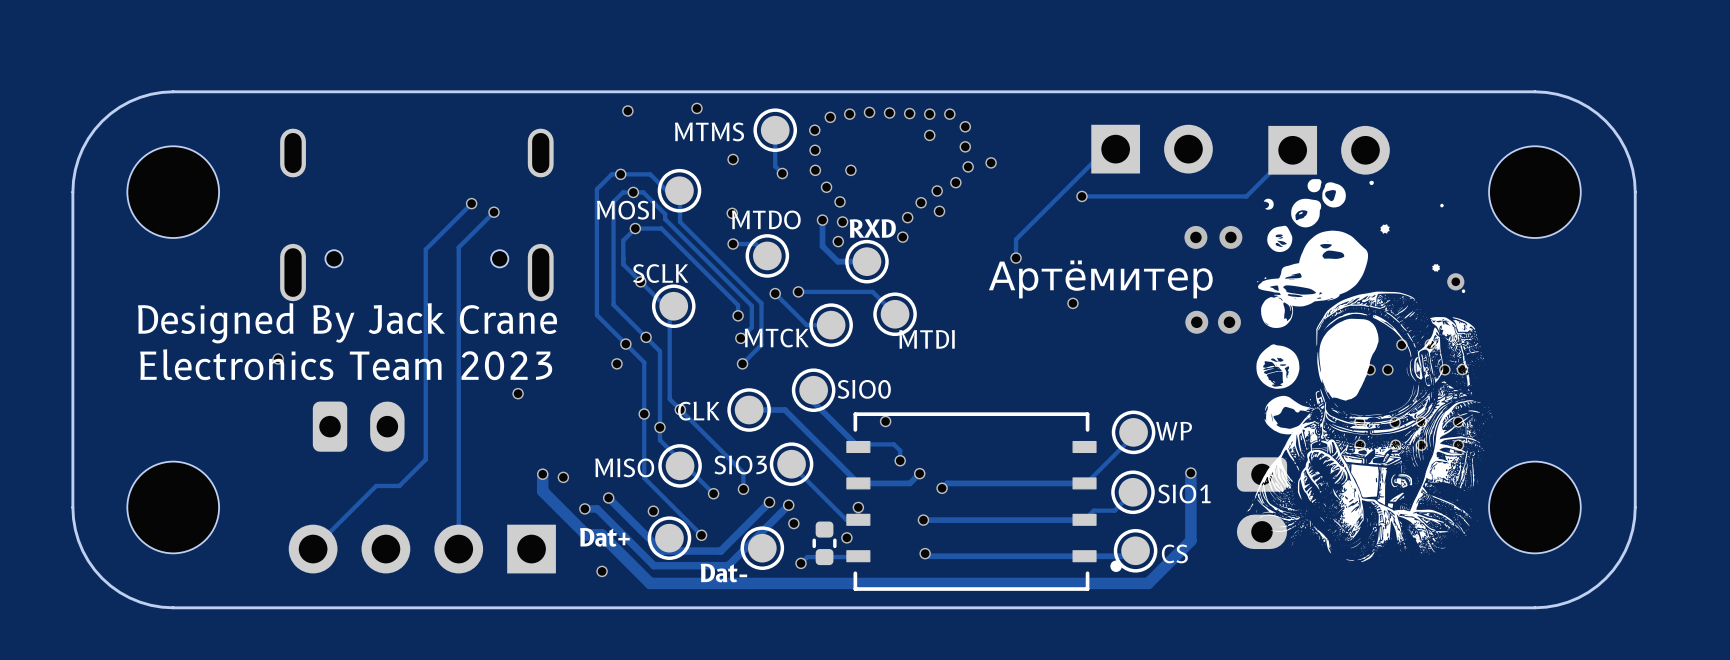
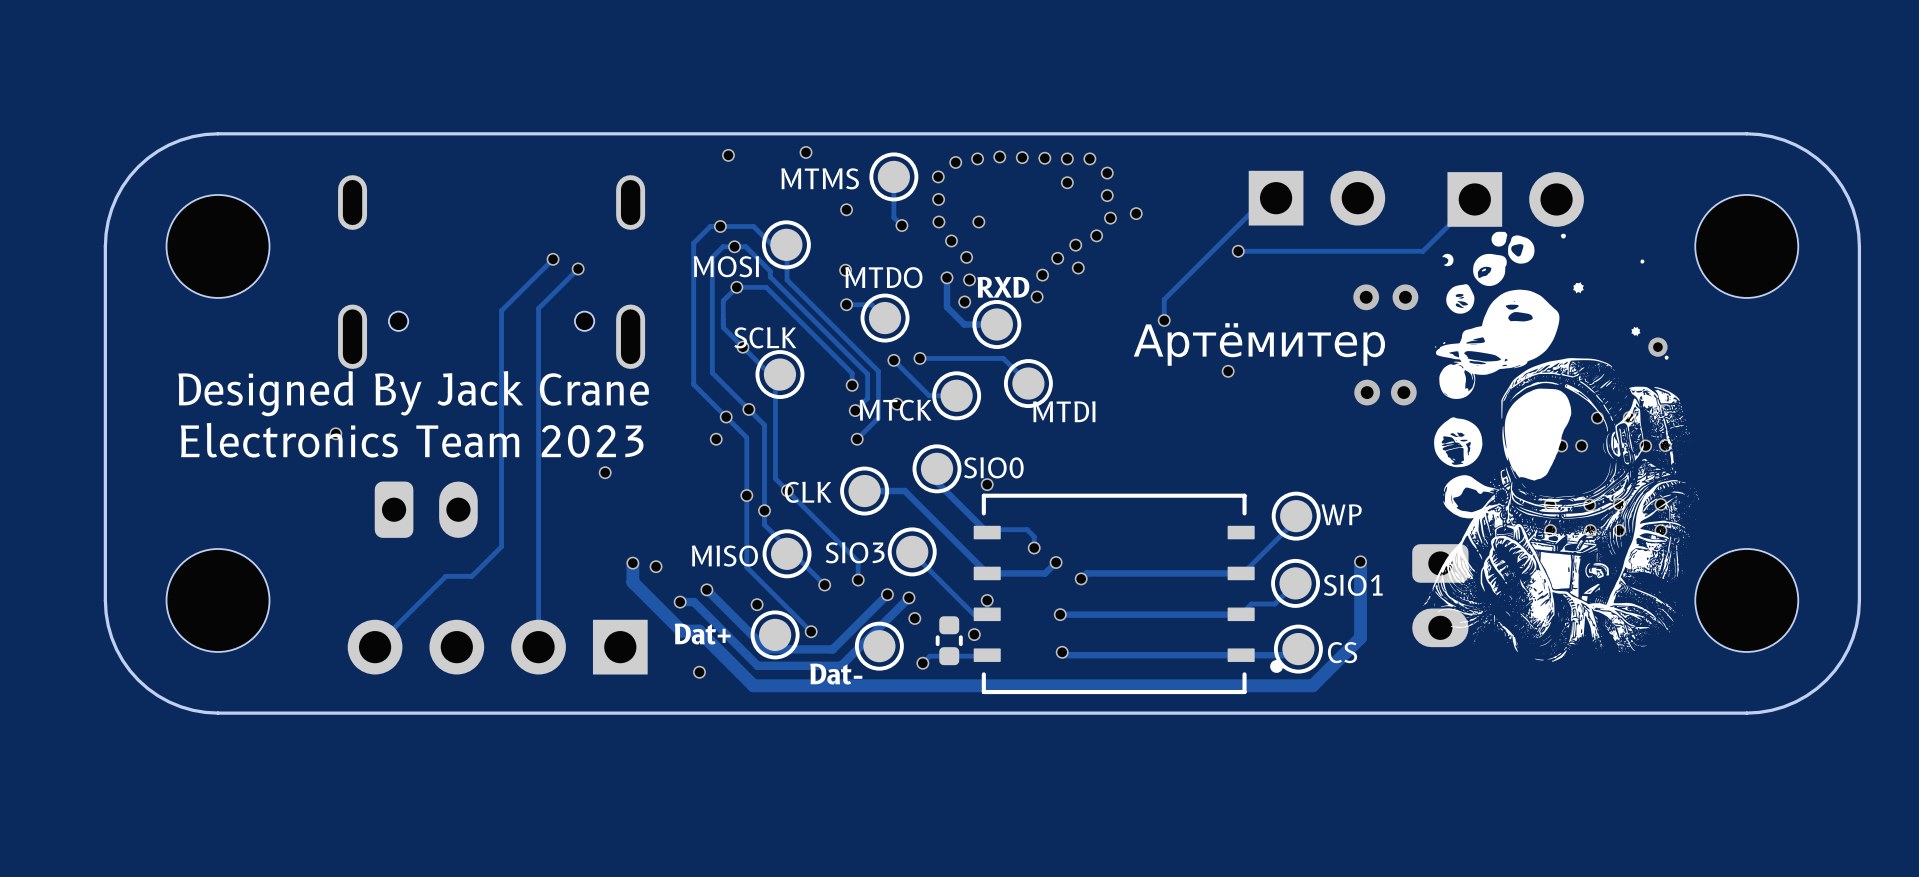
via: none -> (897, 404)
via position: (885, 421) -> (987, 484)

